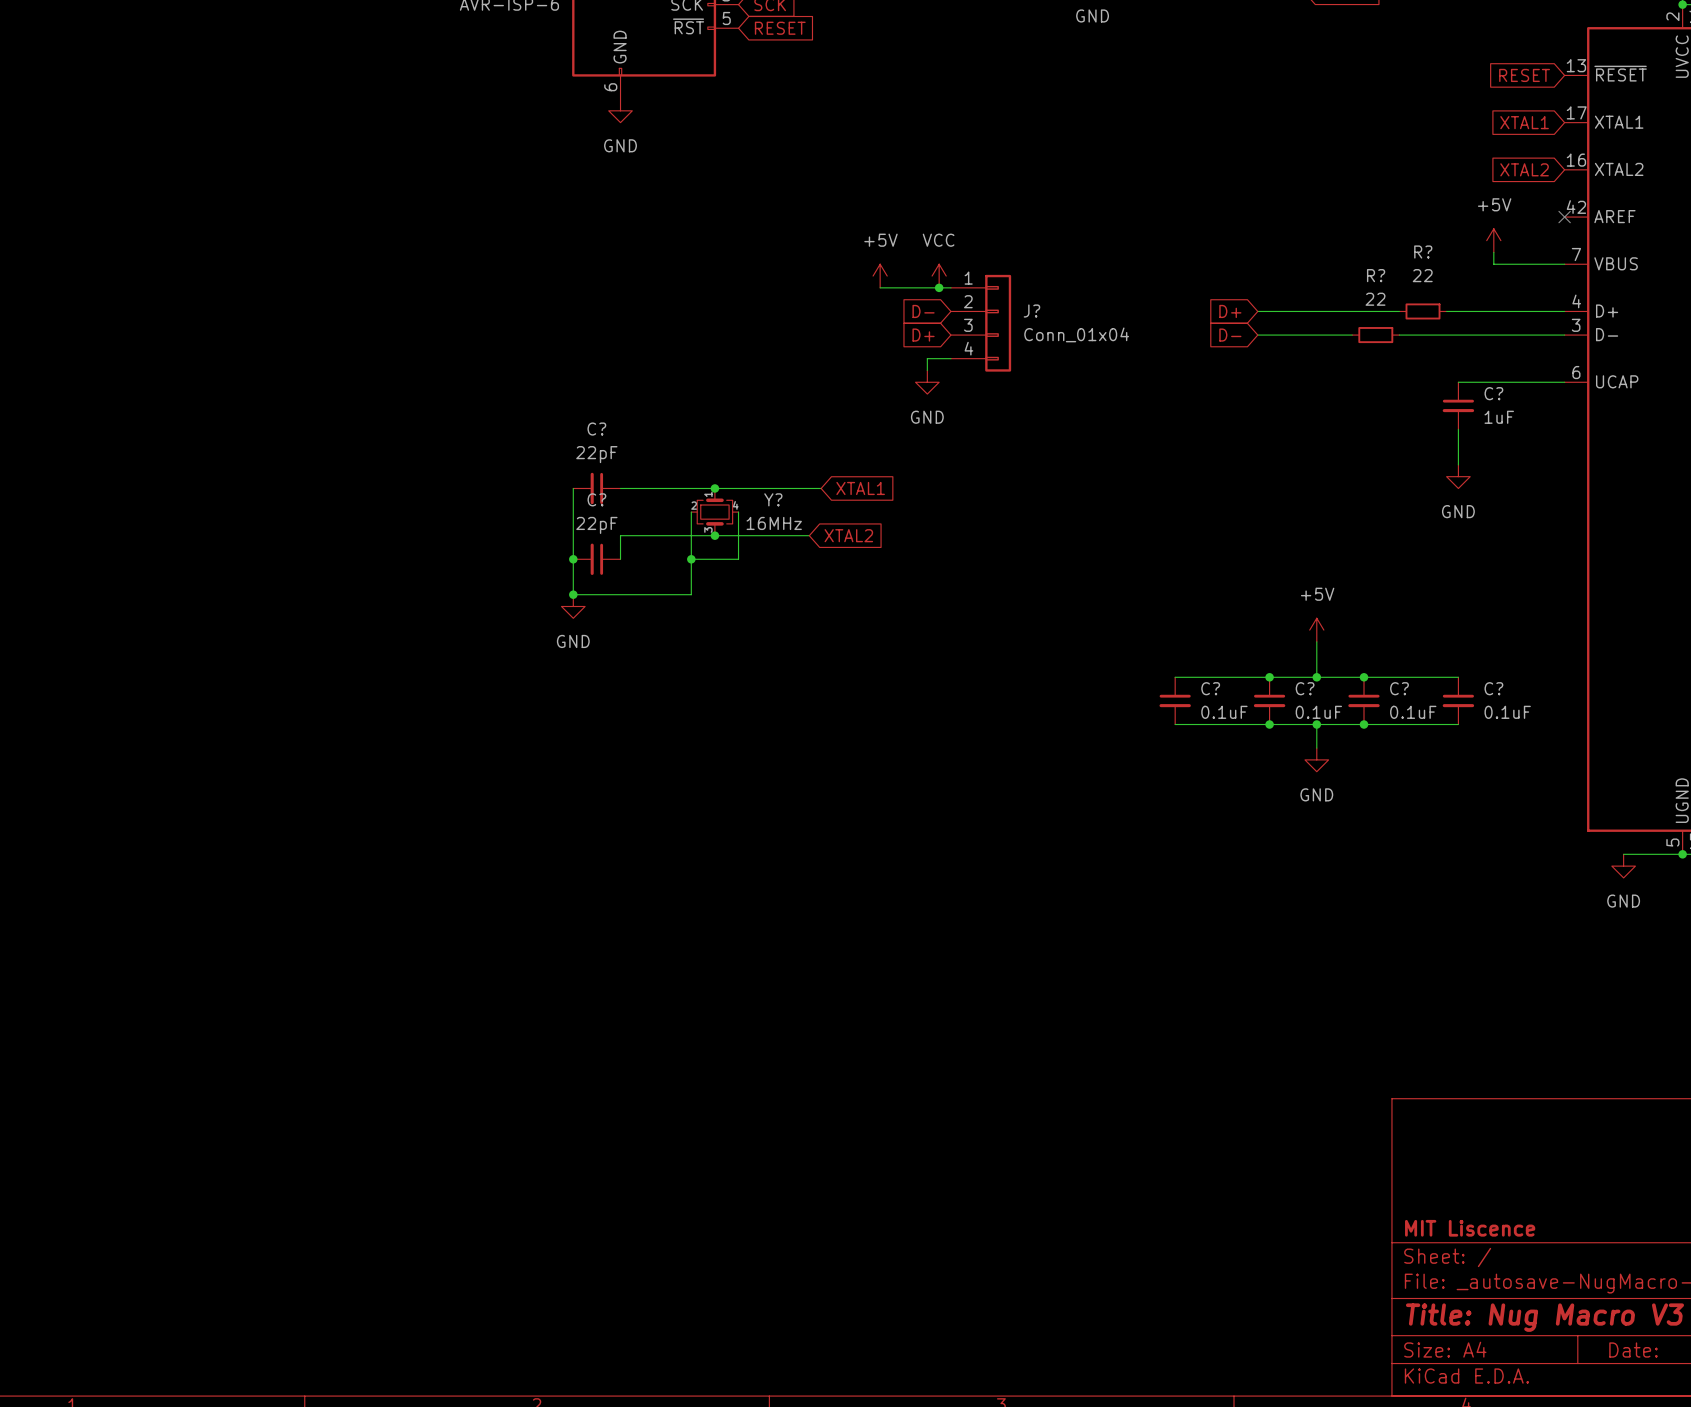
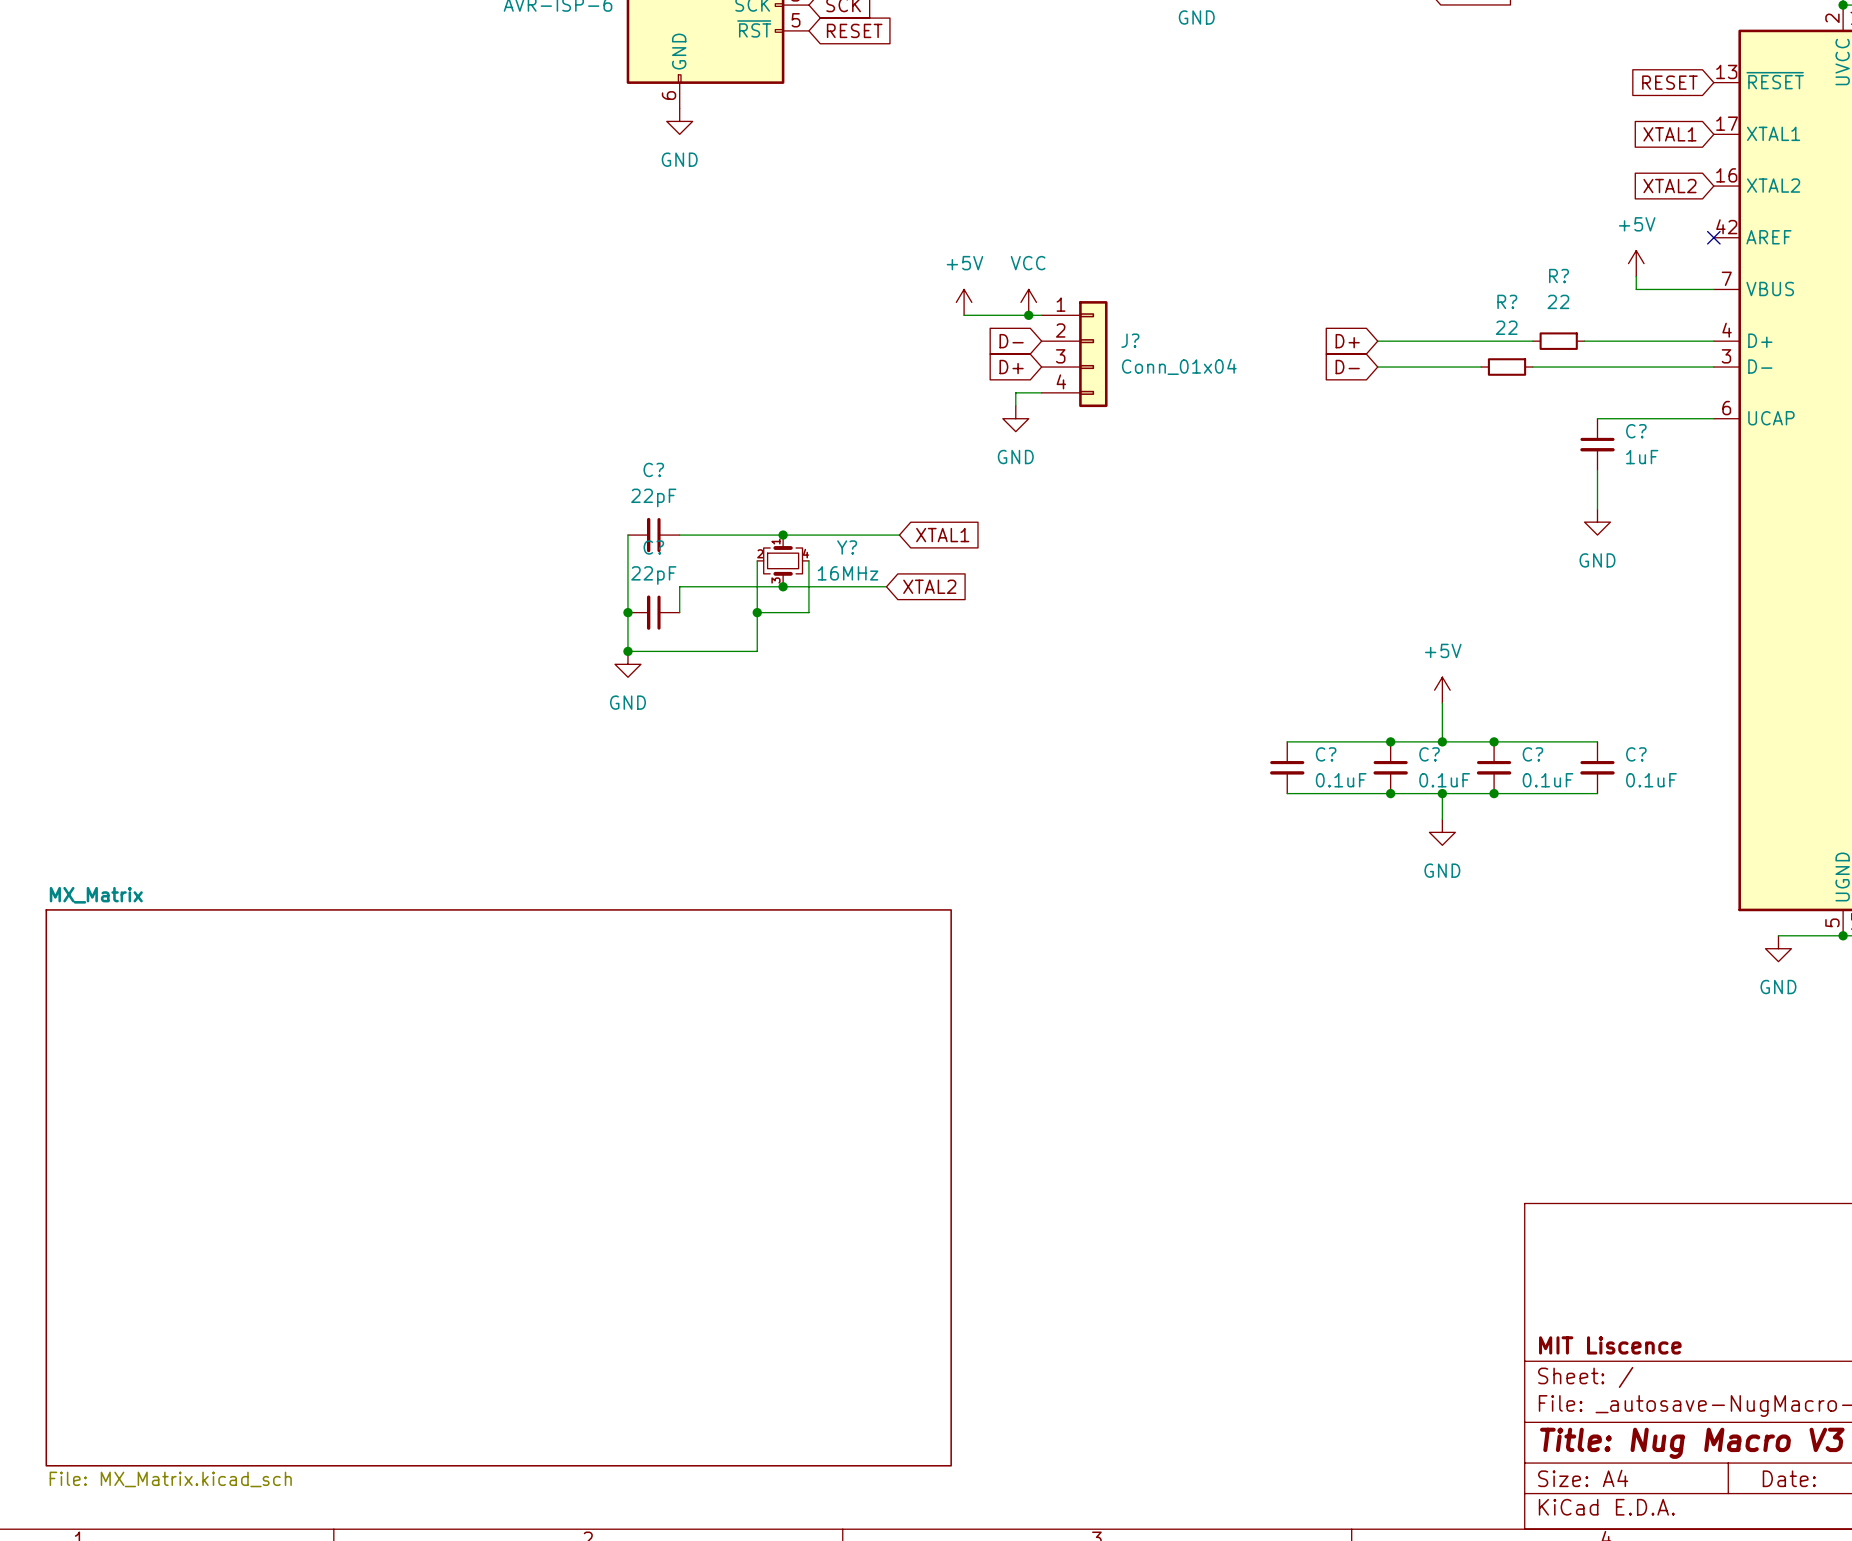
sheet MX_Matrix: none -> File: MX_Matrix.kicad_sch (498, 1187)

